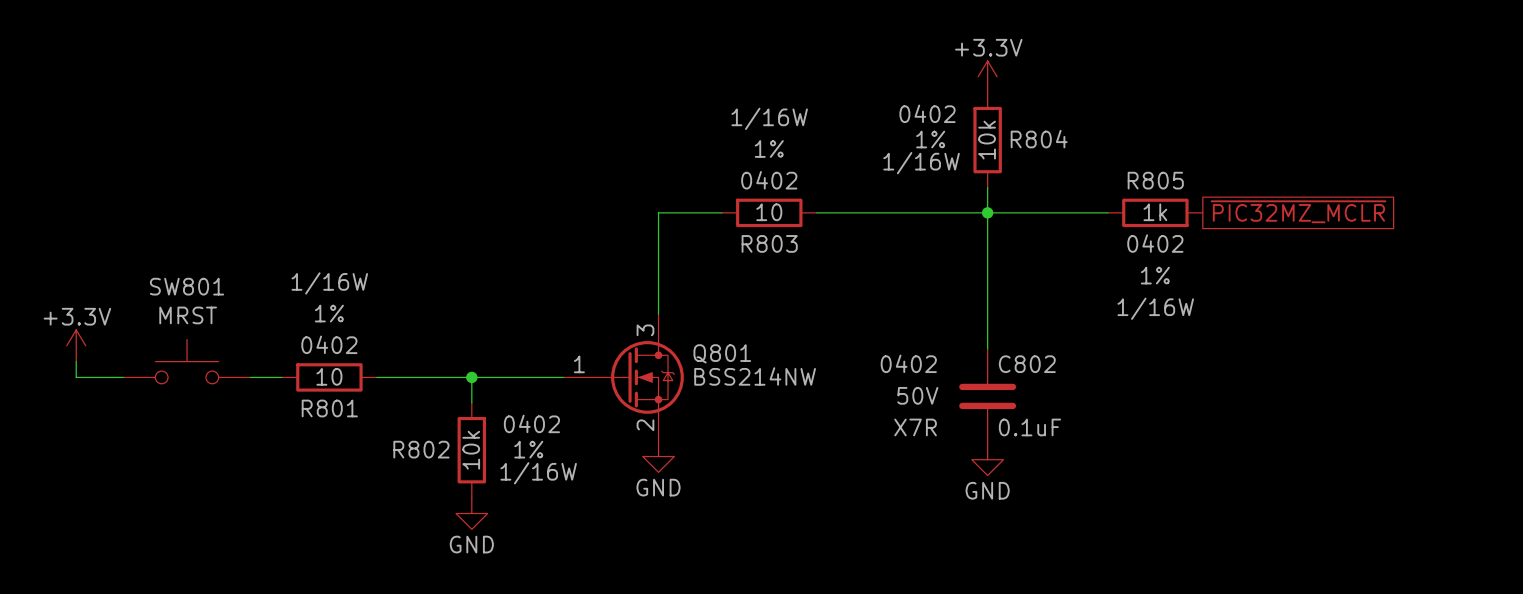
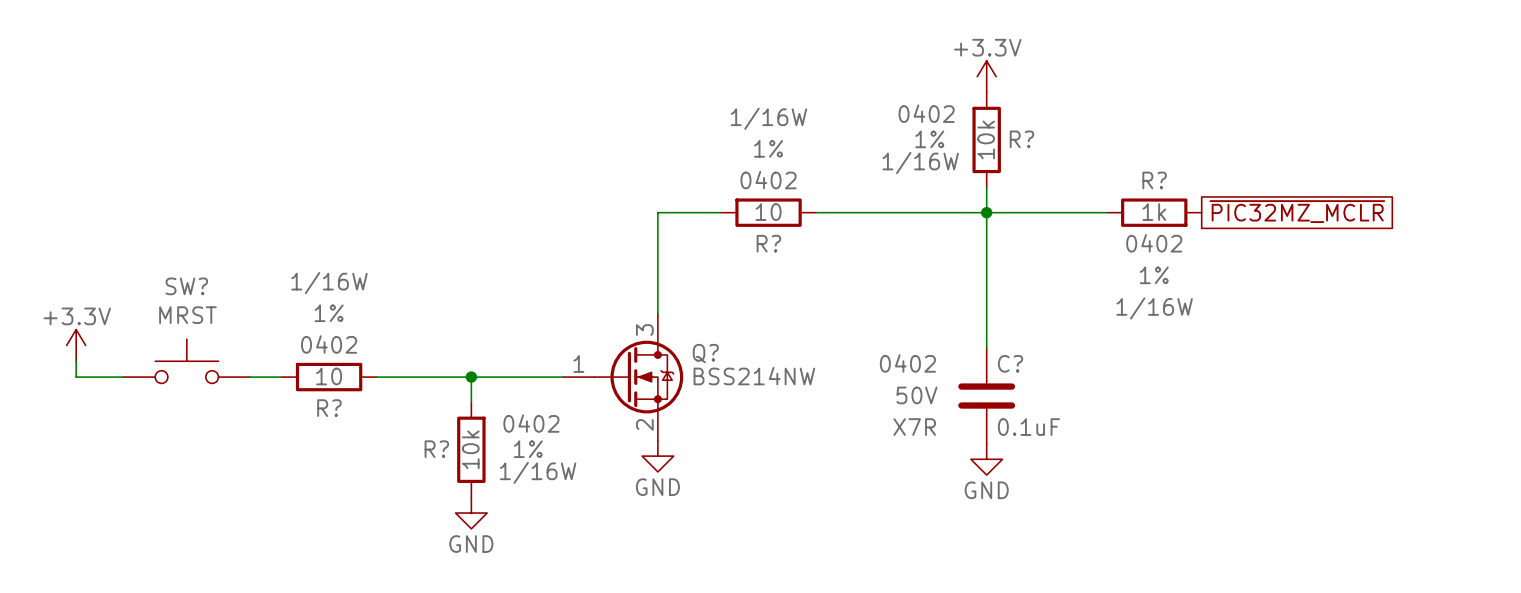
R804 name: R804 (1039, 139) -> R? (1021, 139)
R805 name: R805 (1155, 180) -> R? (1154, 180)
R803 name: R803 (769, 243) -> R? (768, 243)
SW801 name: SW801 (187, 286) -> SW? (186, 286)
Q801 name: Q801 (722, 353) -> Q? (705, 353)
C802 name: C802 (1027, 364) -> C? (1010, 363)
R801 name: R801 (329, 408) -> R? (329, 408)
R802 name: R802 (421, 449) -> R? (436, 449)

